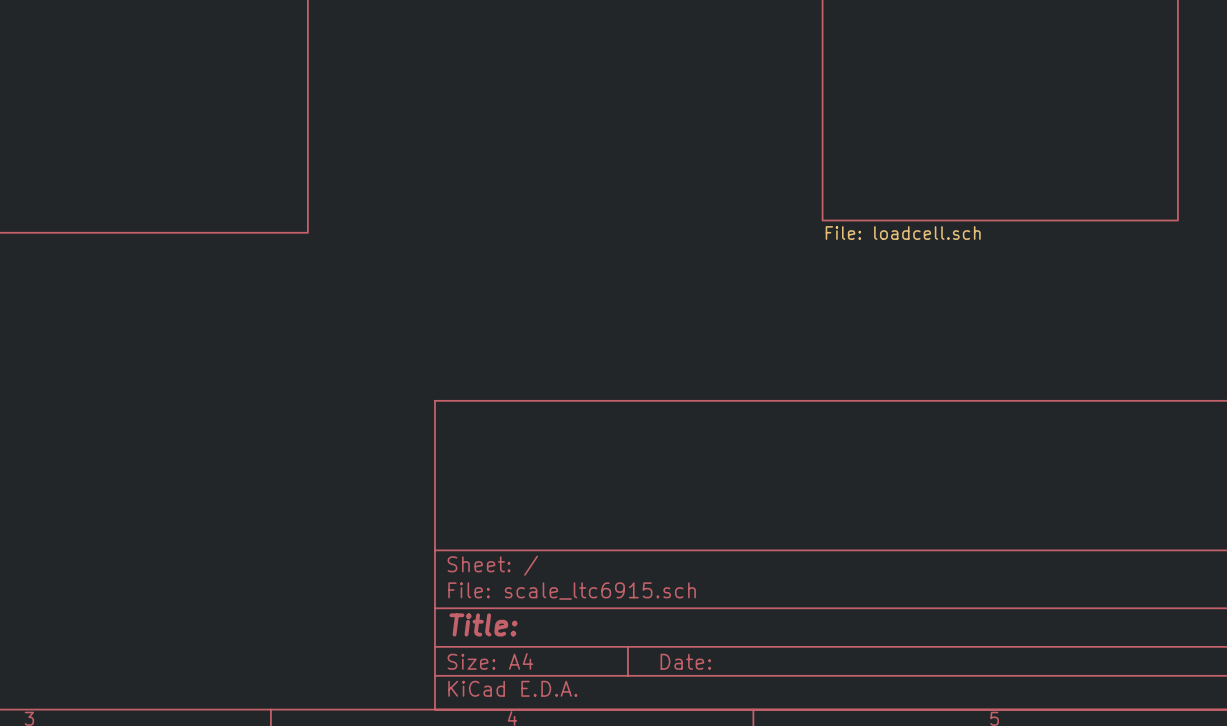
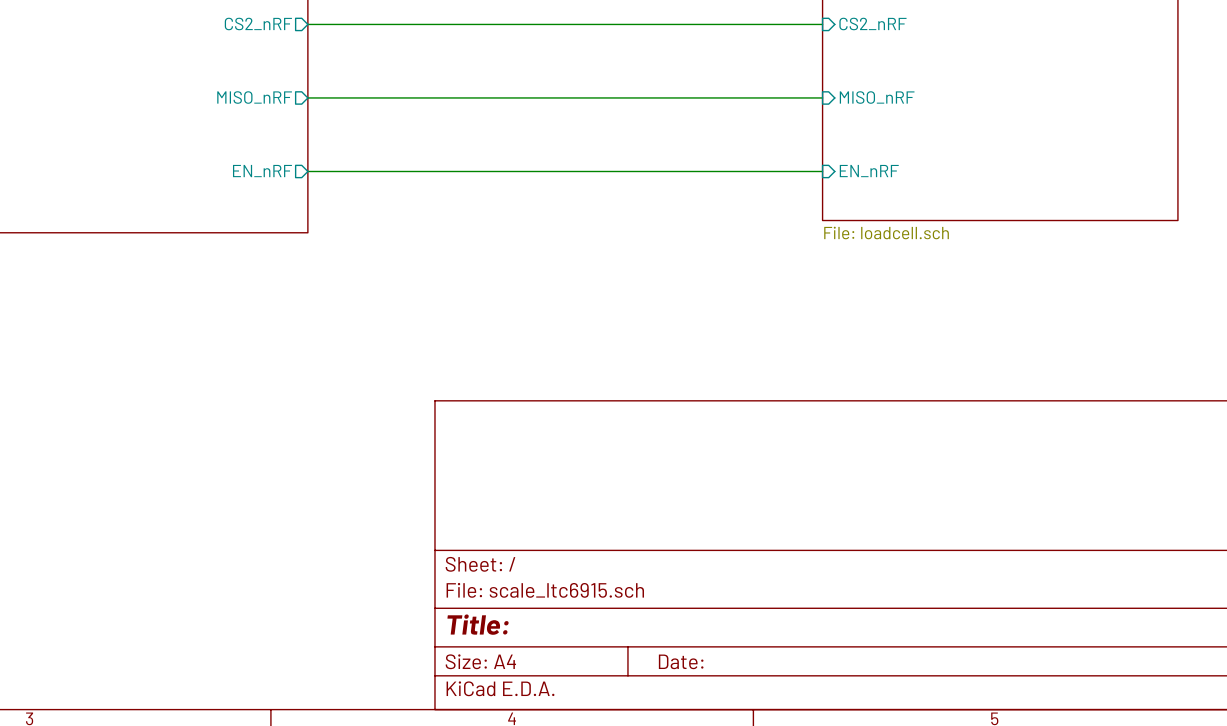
sheet pin: none -> CS2_nRF (258, 23)
wire: none -> (307, 24) (822, 24)
sheet pin: none -> CS2_nRF (872, 23)
wire: none -> (307, 97) (822, 97)
sheet pin: none -> MISO_nRF (254, 97)
sheet pin: none -> MISO_nRF (877, 97)
sheet pin: none -> EN_nRF (262, 171)
wire: none -> (307, 171) (822, 171)
sheet pin: none -> EN_nRF (869, 171)

